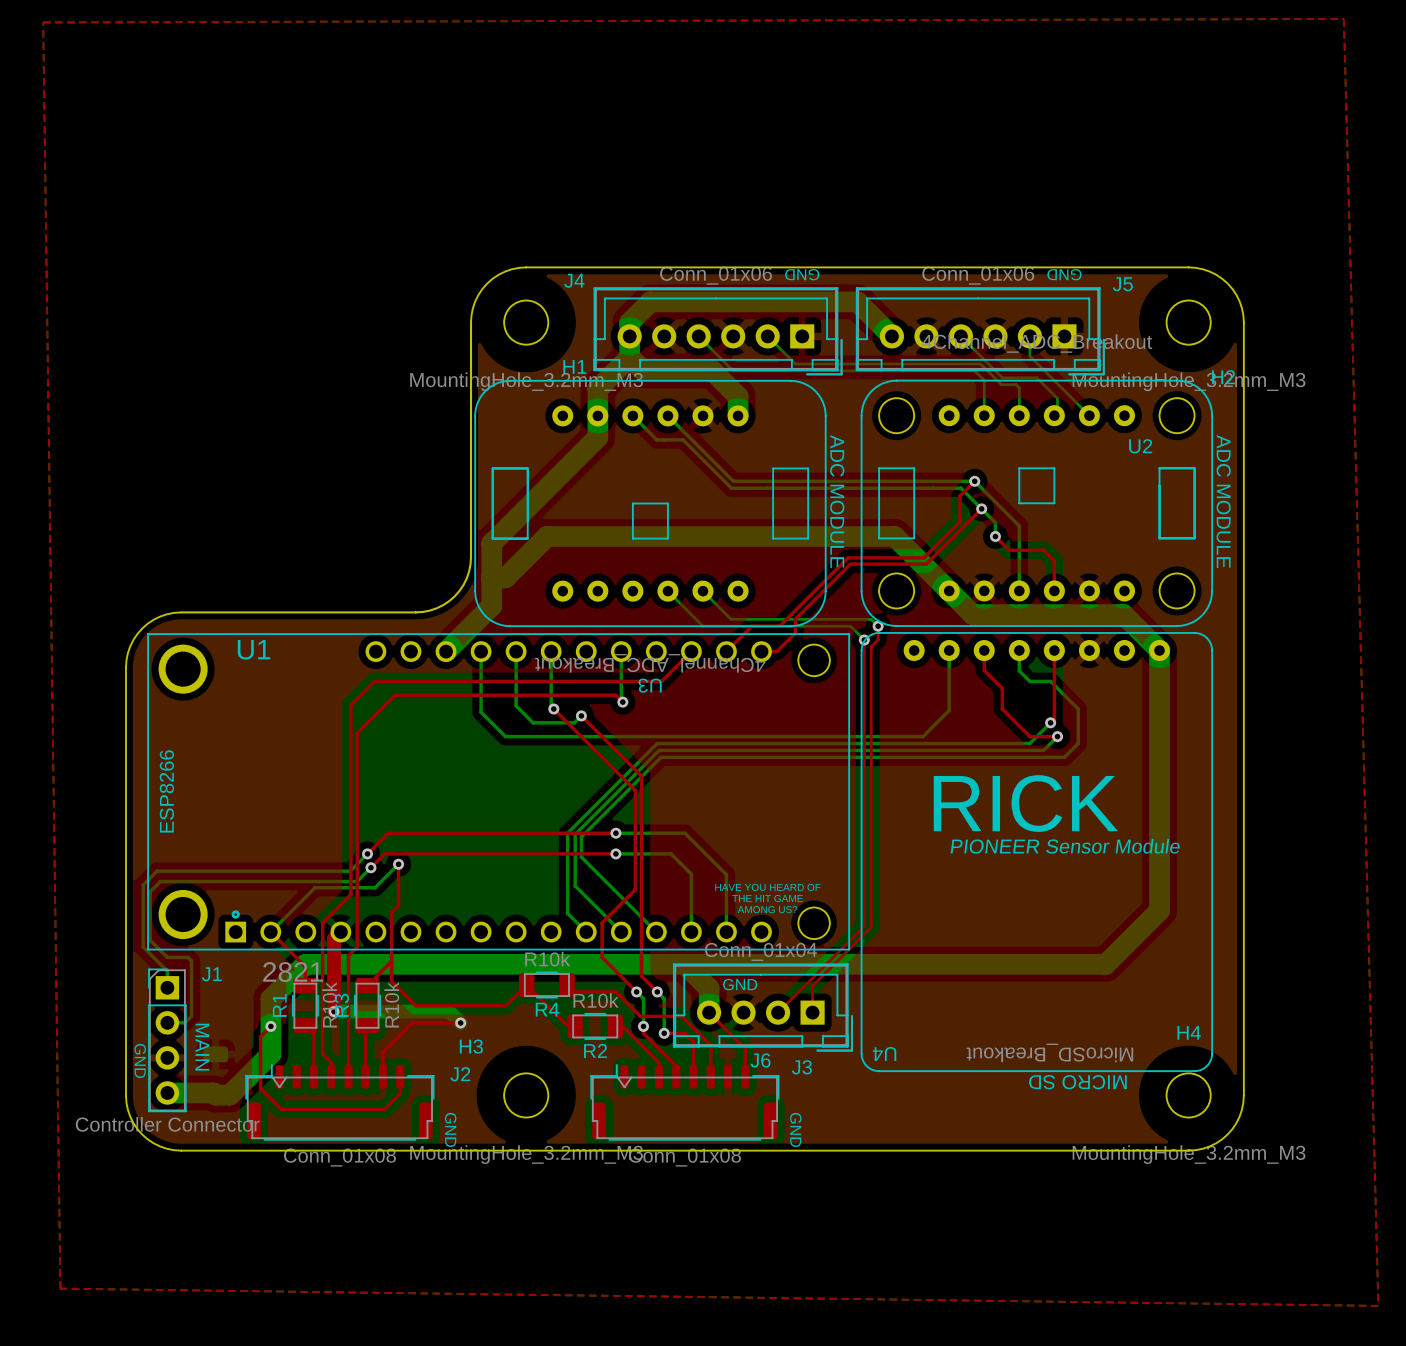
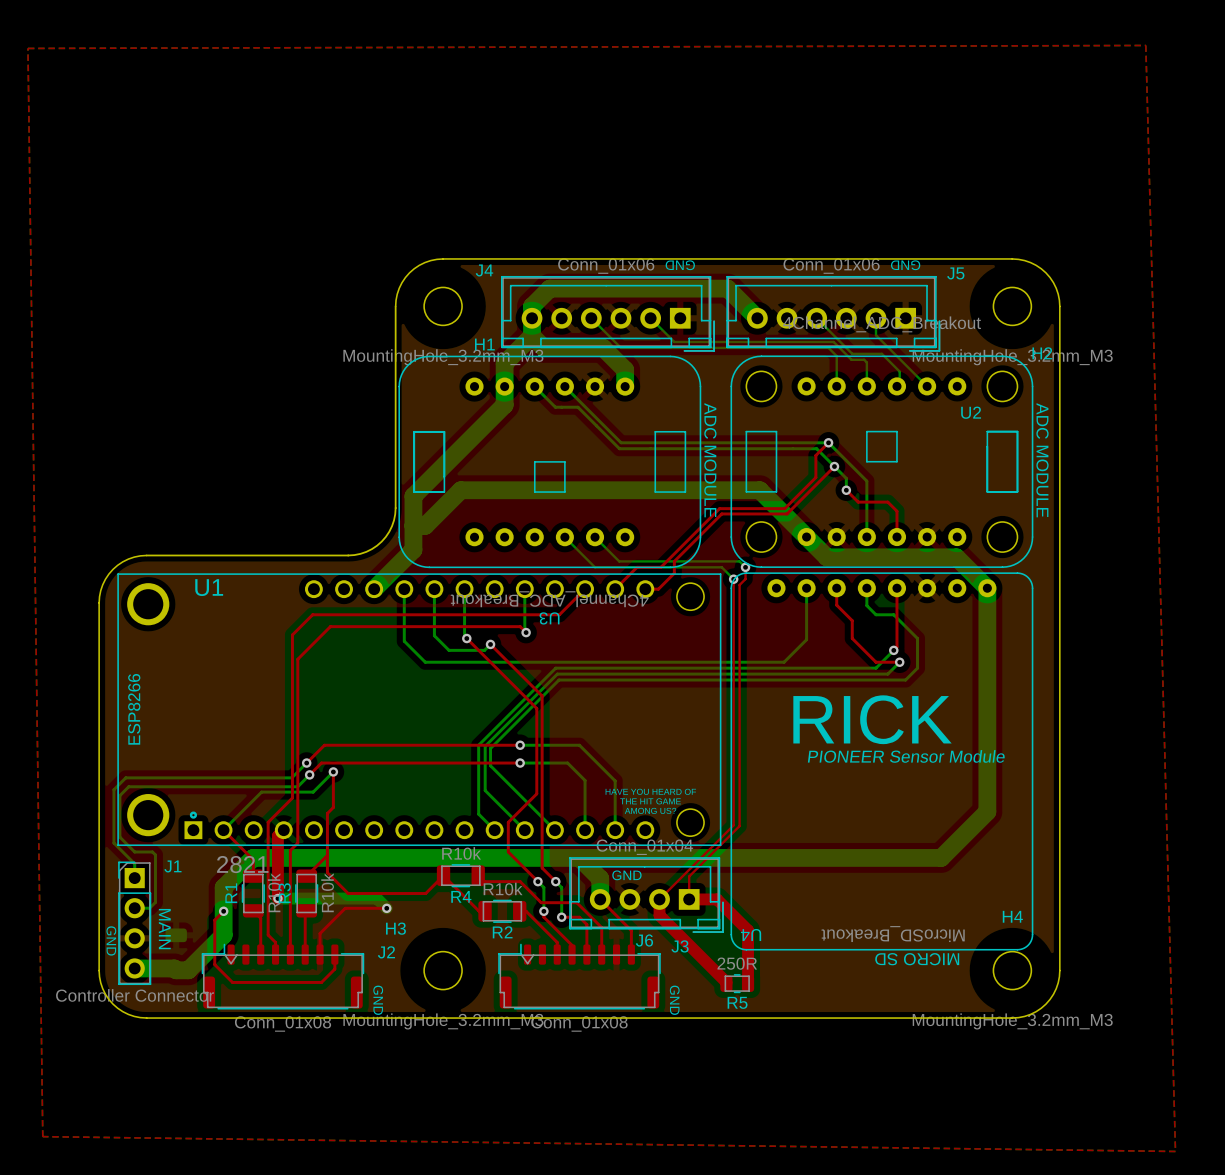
top track: none -> (659, 899) (659, 915) (726, 983)
top track: none -> (689, 899) (717, 899) (748, 930) (748, 983)
R5: none -> 250R (737, 983)

